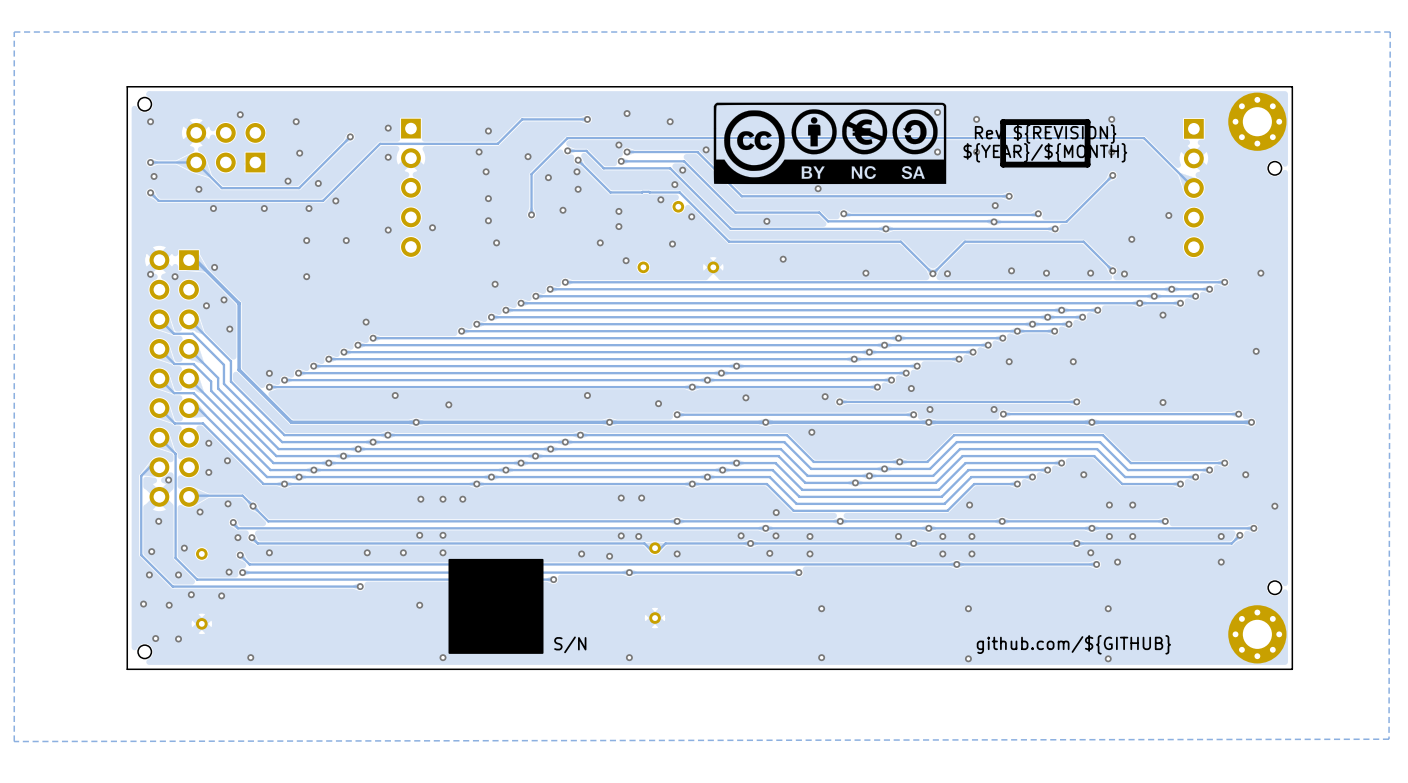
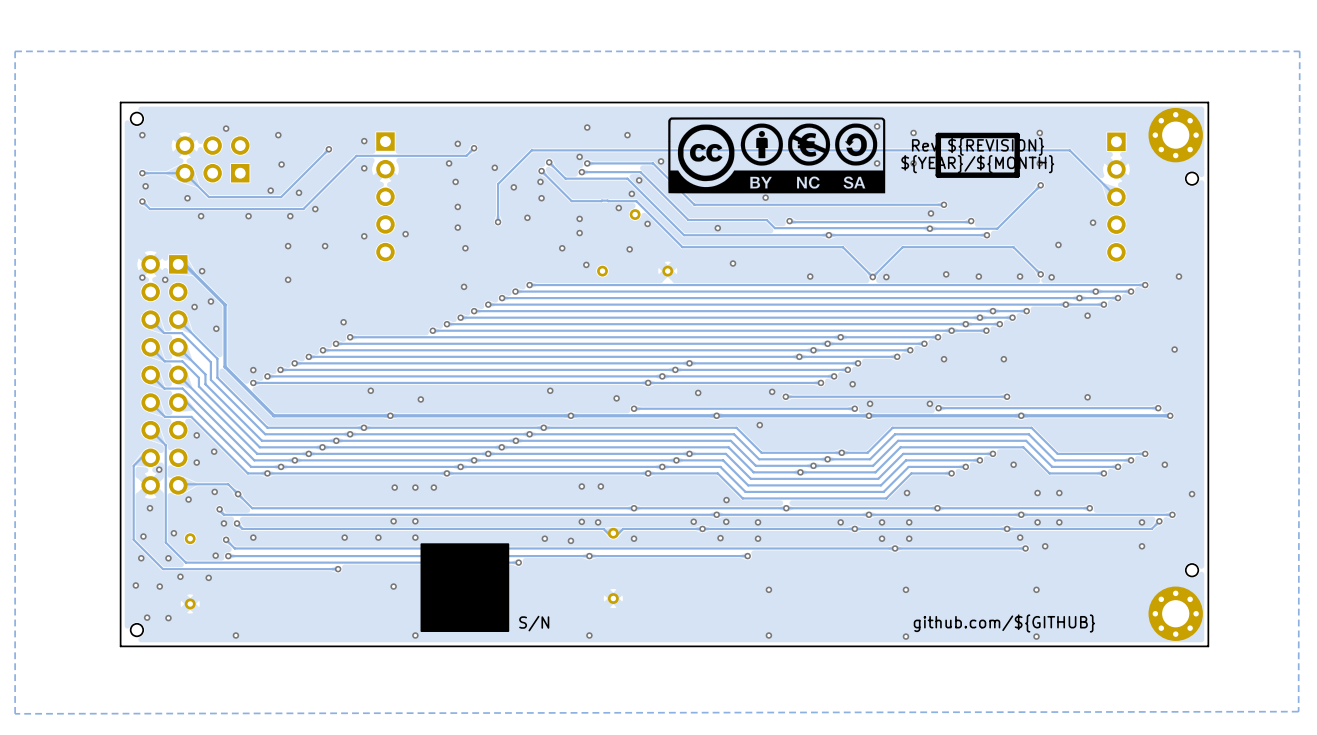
track: (587, 119) (522, 119) (505, 135) -> none
via: (587, 119) -> none
via: none -> (474, 148)
via: (567, 150) -> none
track: (586, 150) (567, 150) -> none
via: none -> (549, 162)

